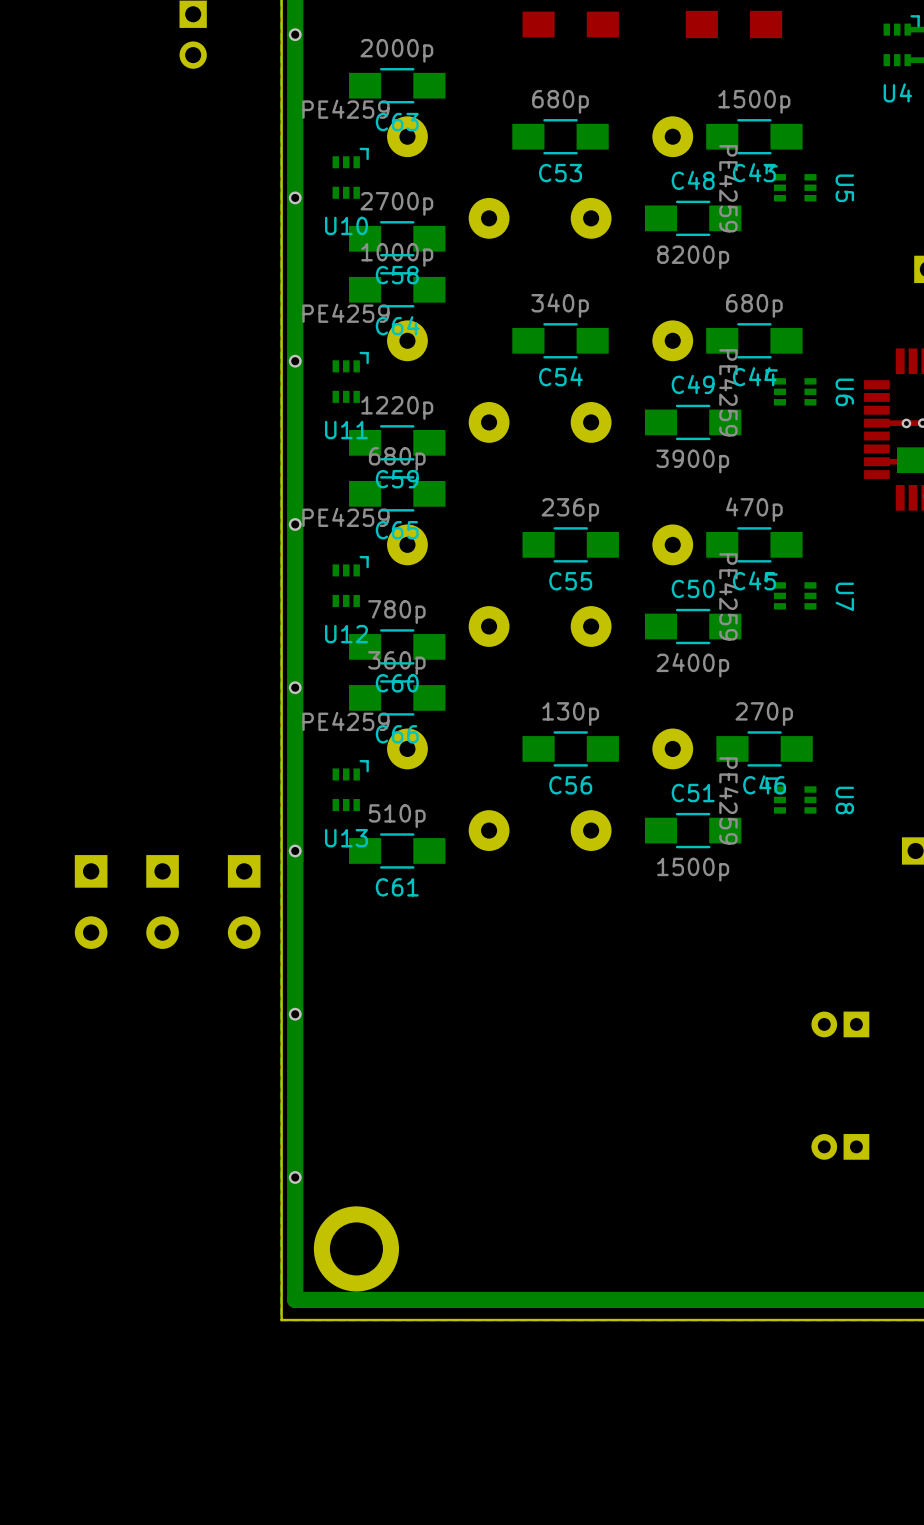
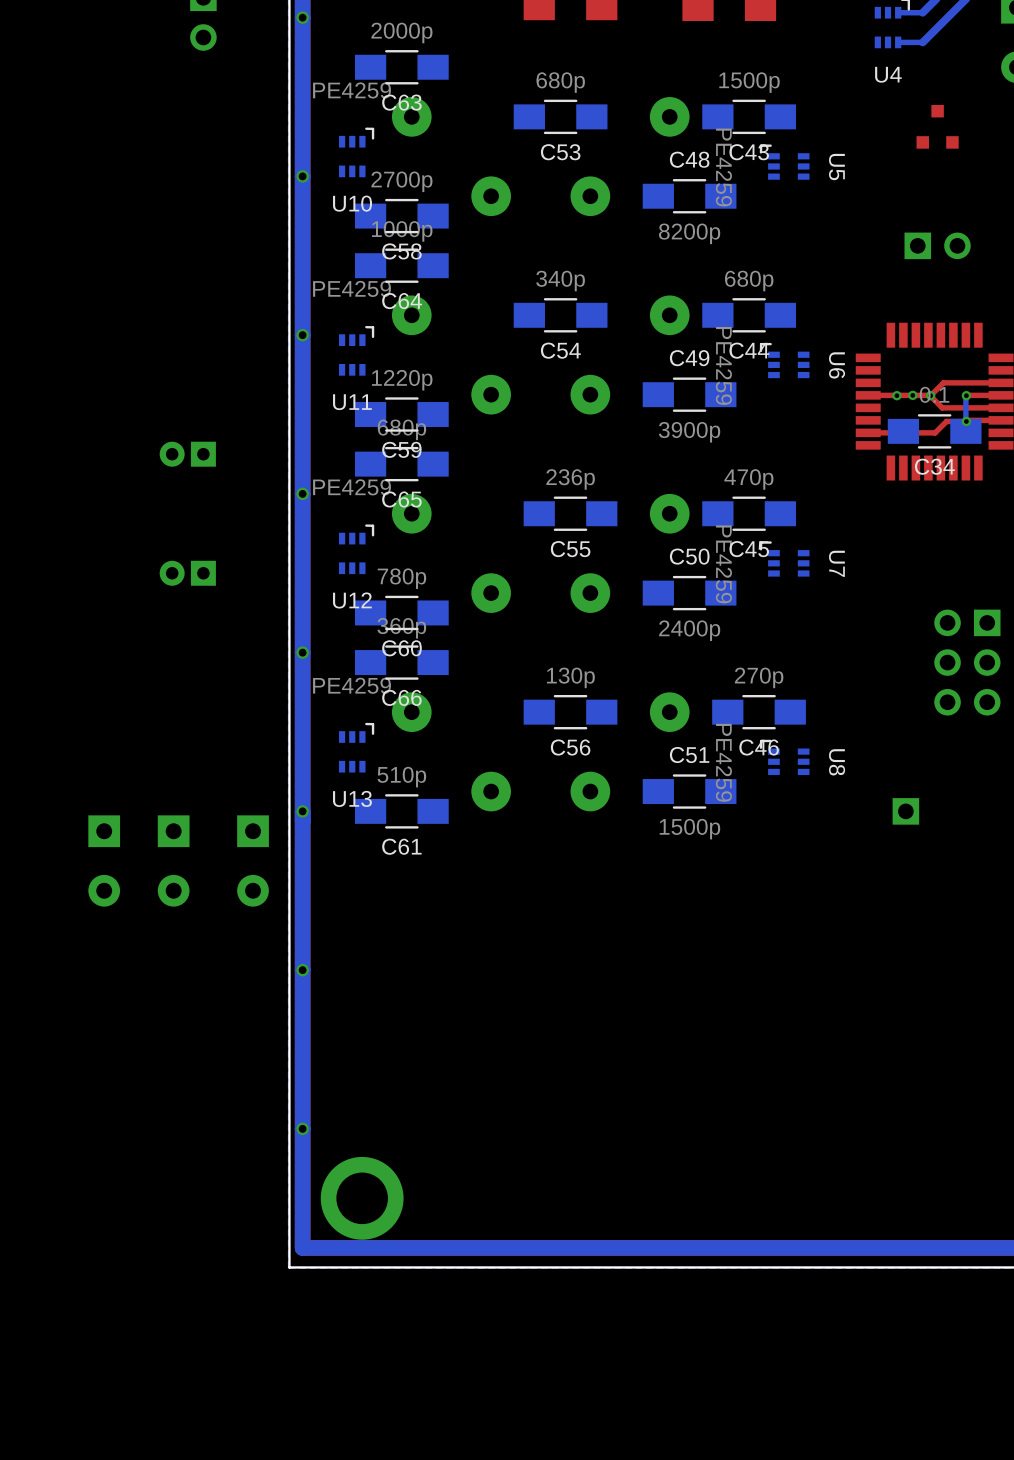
part: none -> (187, 454)
part: none -> (187, 573)
part: (840, 1024) -> none
part: (840, 1146) -> none

